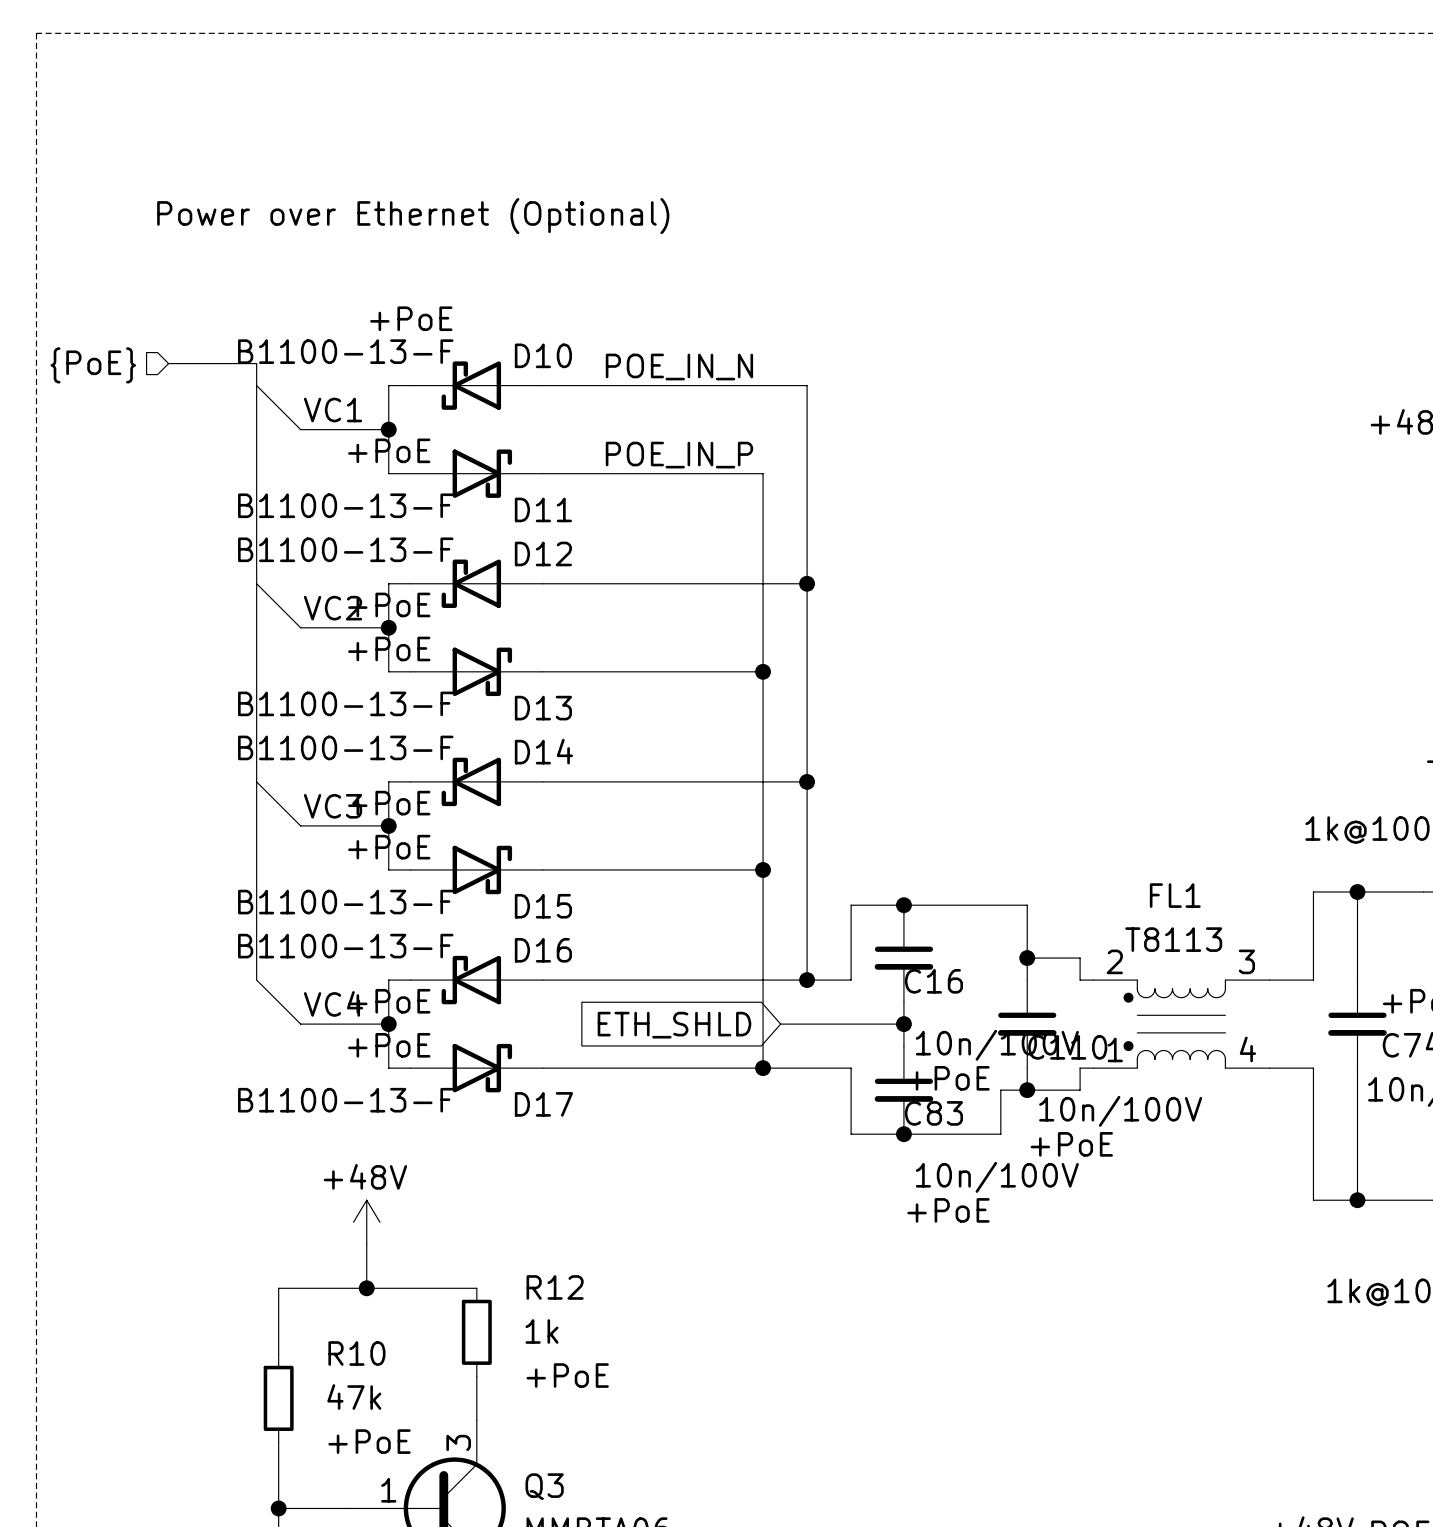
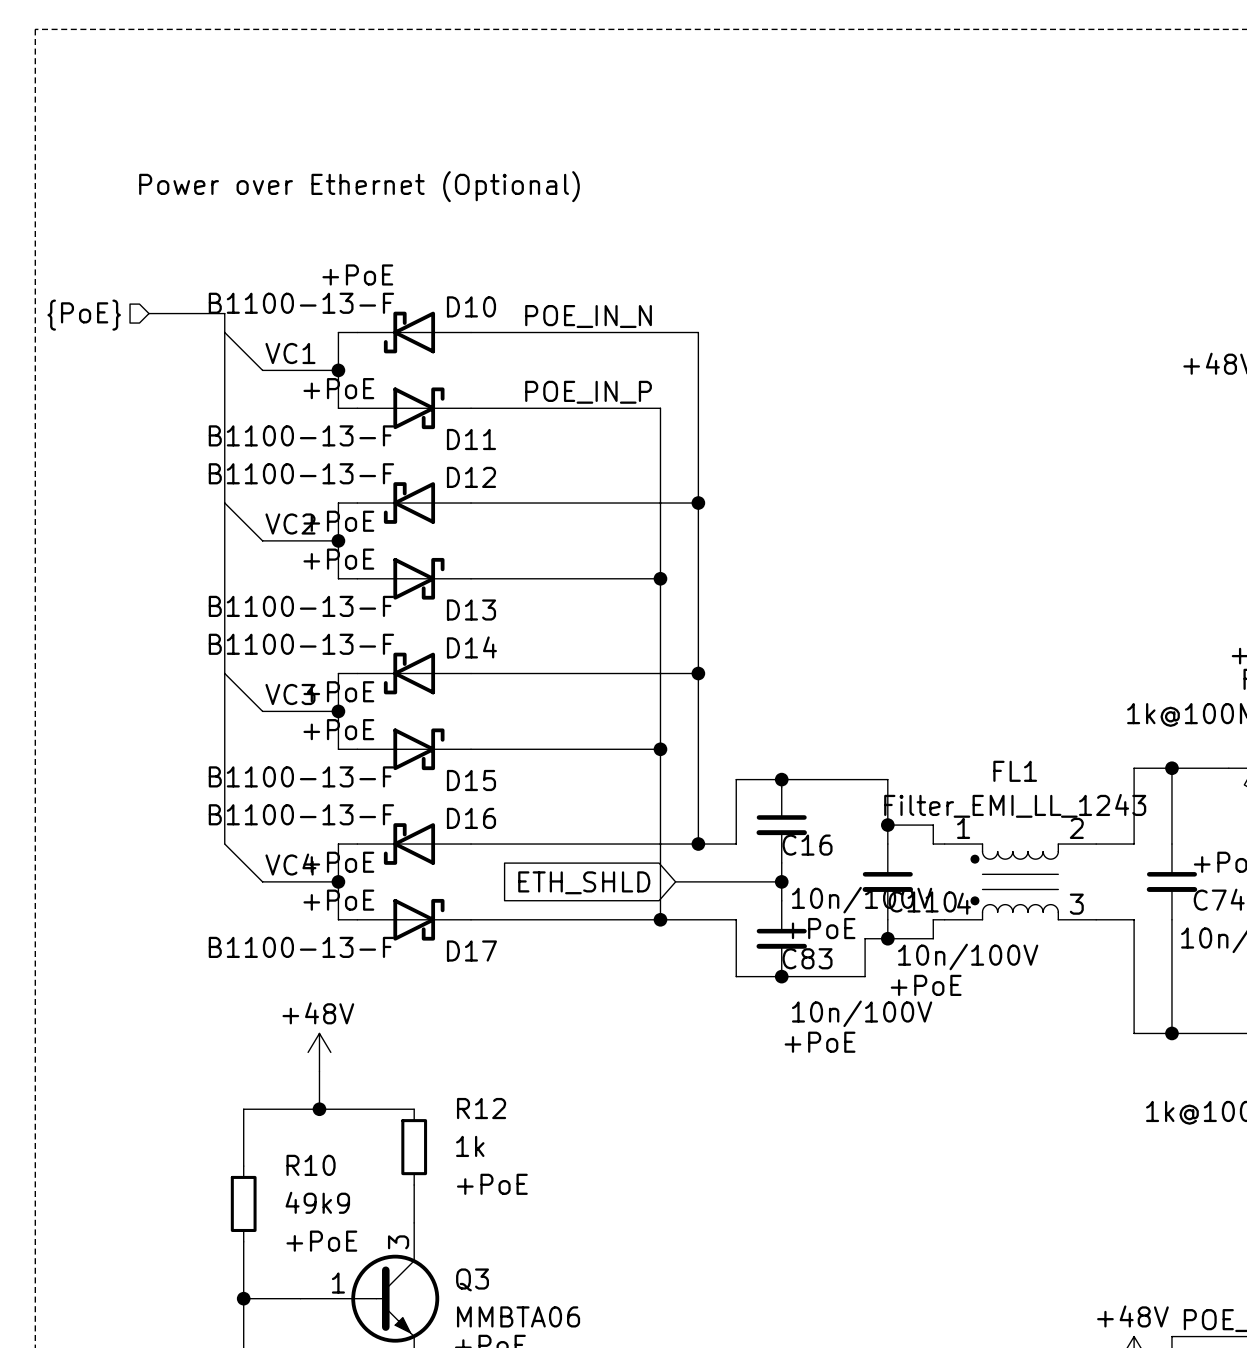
FL1 value: T8113 (1173, 939) -> Filter_EMI_LL_1243 (1015, 805)
FL1 pin number: 2 (1114, 961) -> 1 (963, 828)
FL1 pin number: 3 (1246, 961) -> 2 (1076, 828)
FL1 pin number: 1 (1115, 1049) -> 4 (964, 903)
FL1 pin number: 4 (1247, 1049) -> 3 (1076, 904)
R10 value: 47k (354, 1397) -> 49k9 (317, 1202)

